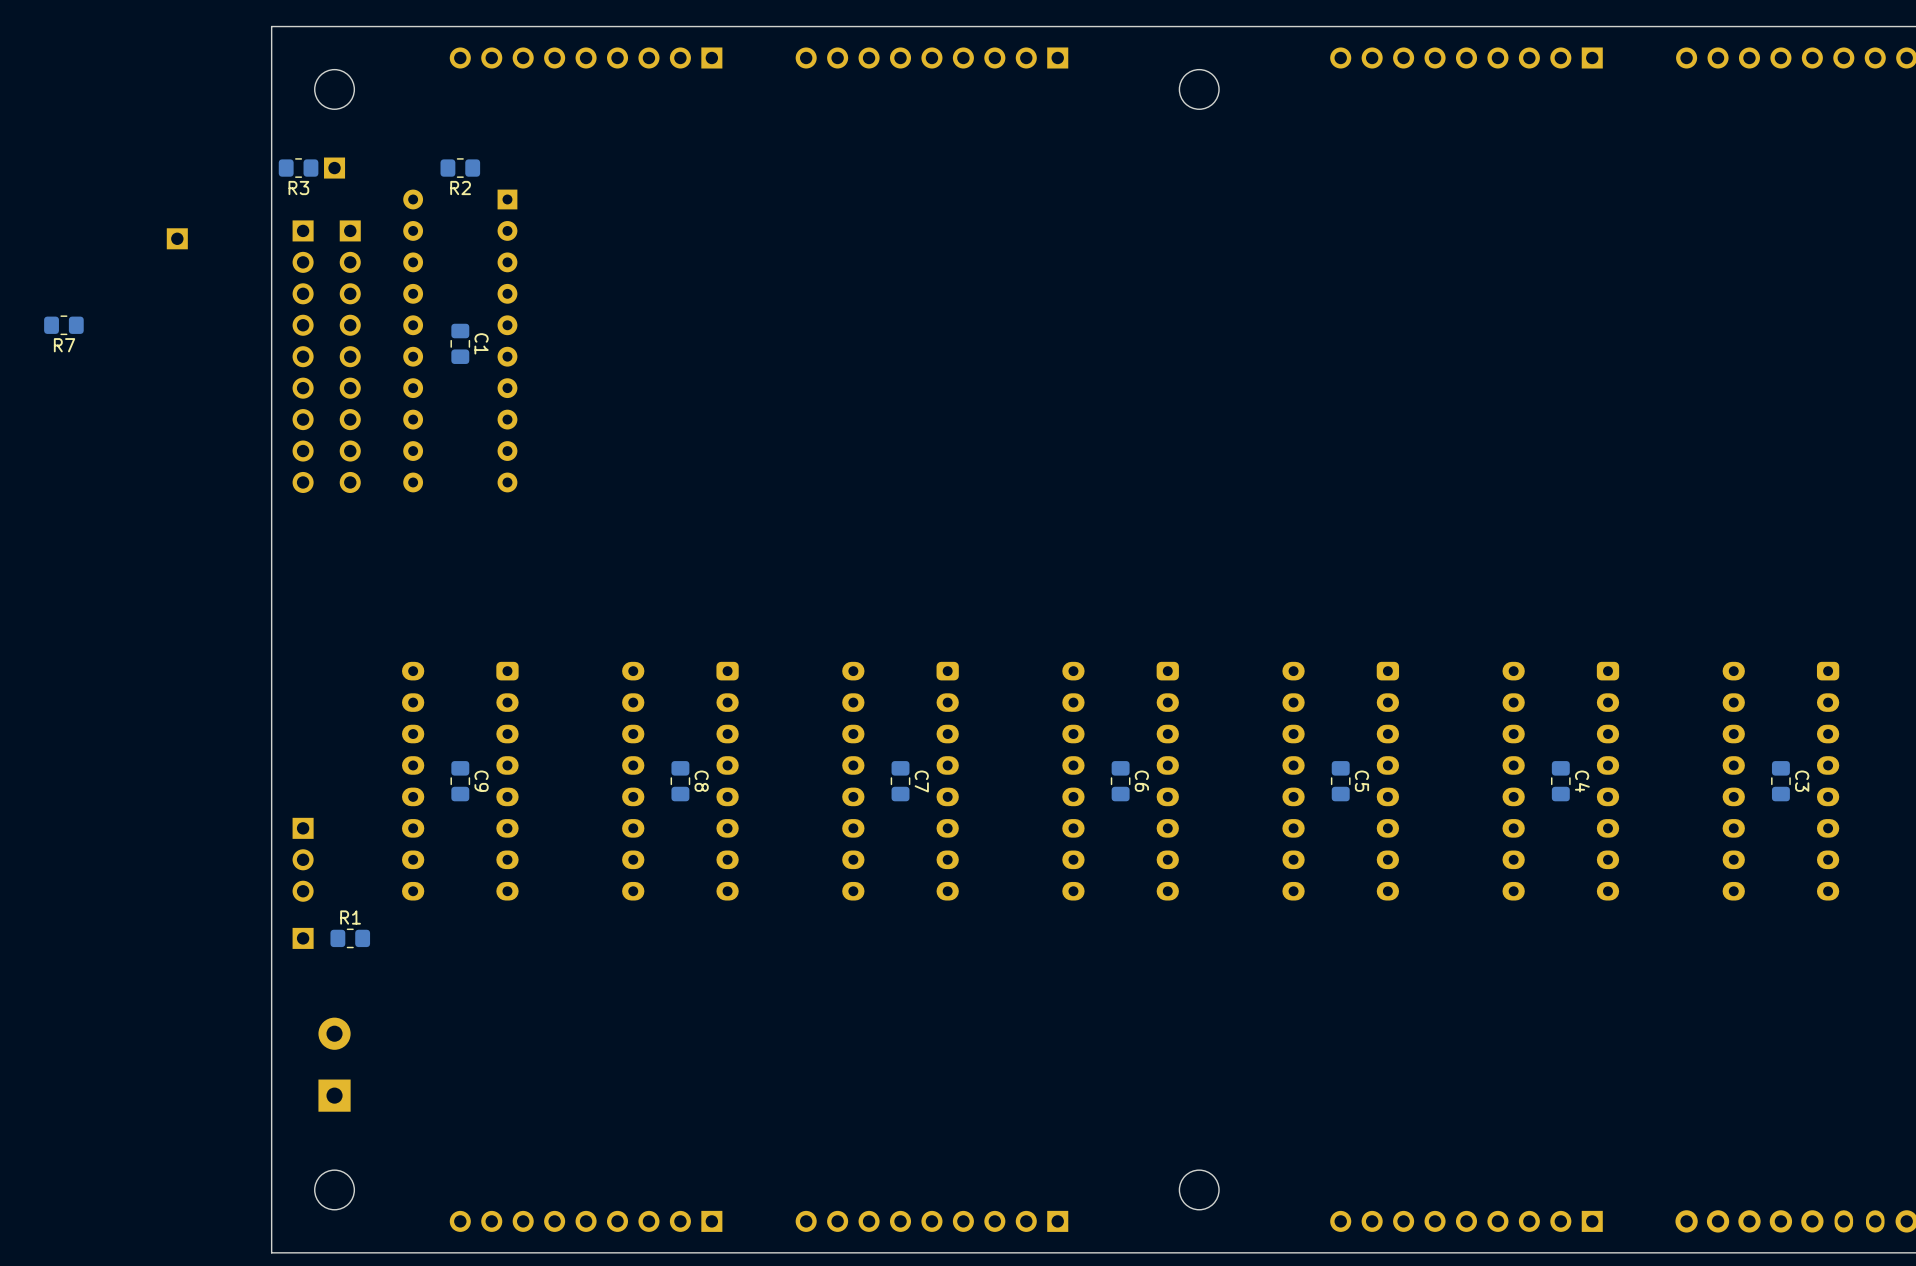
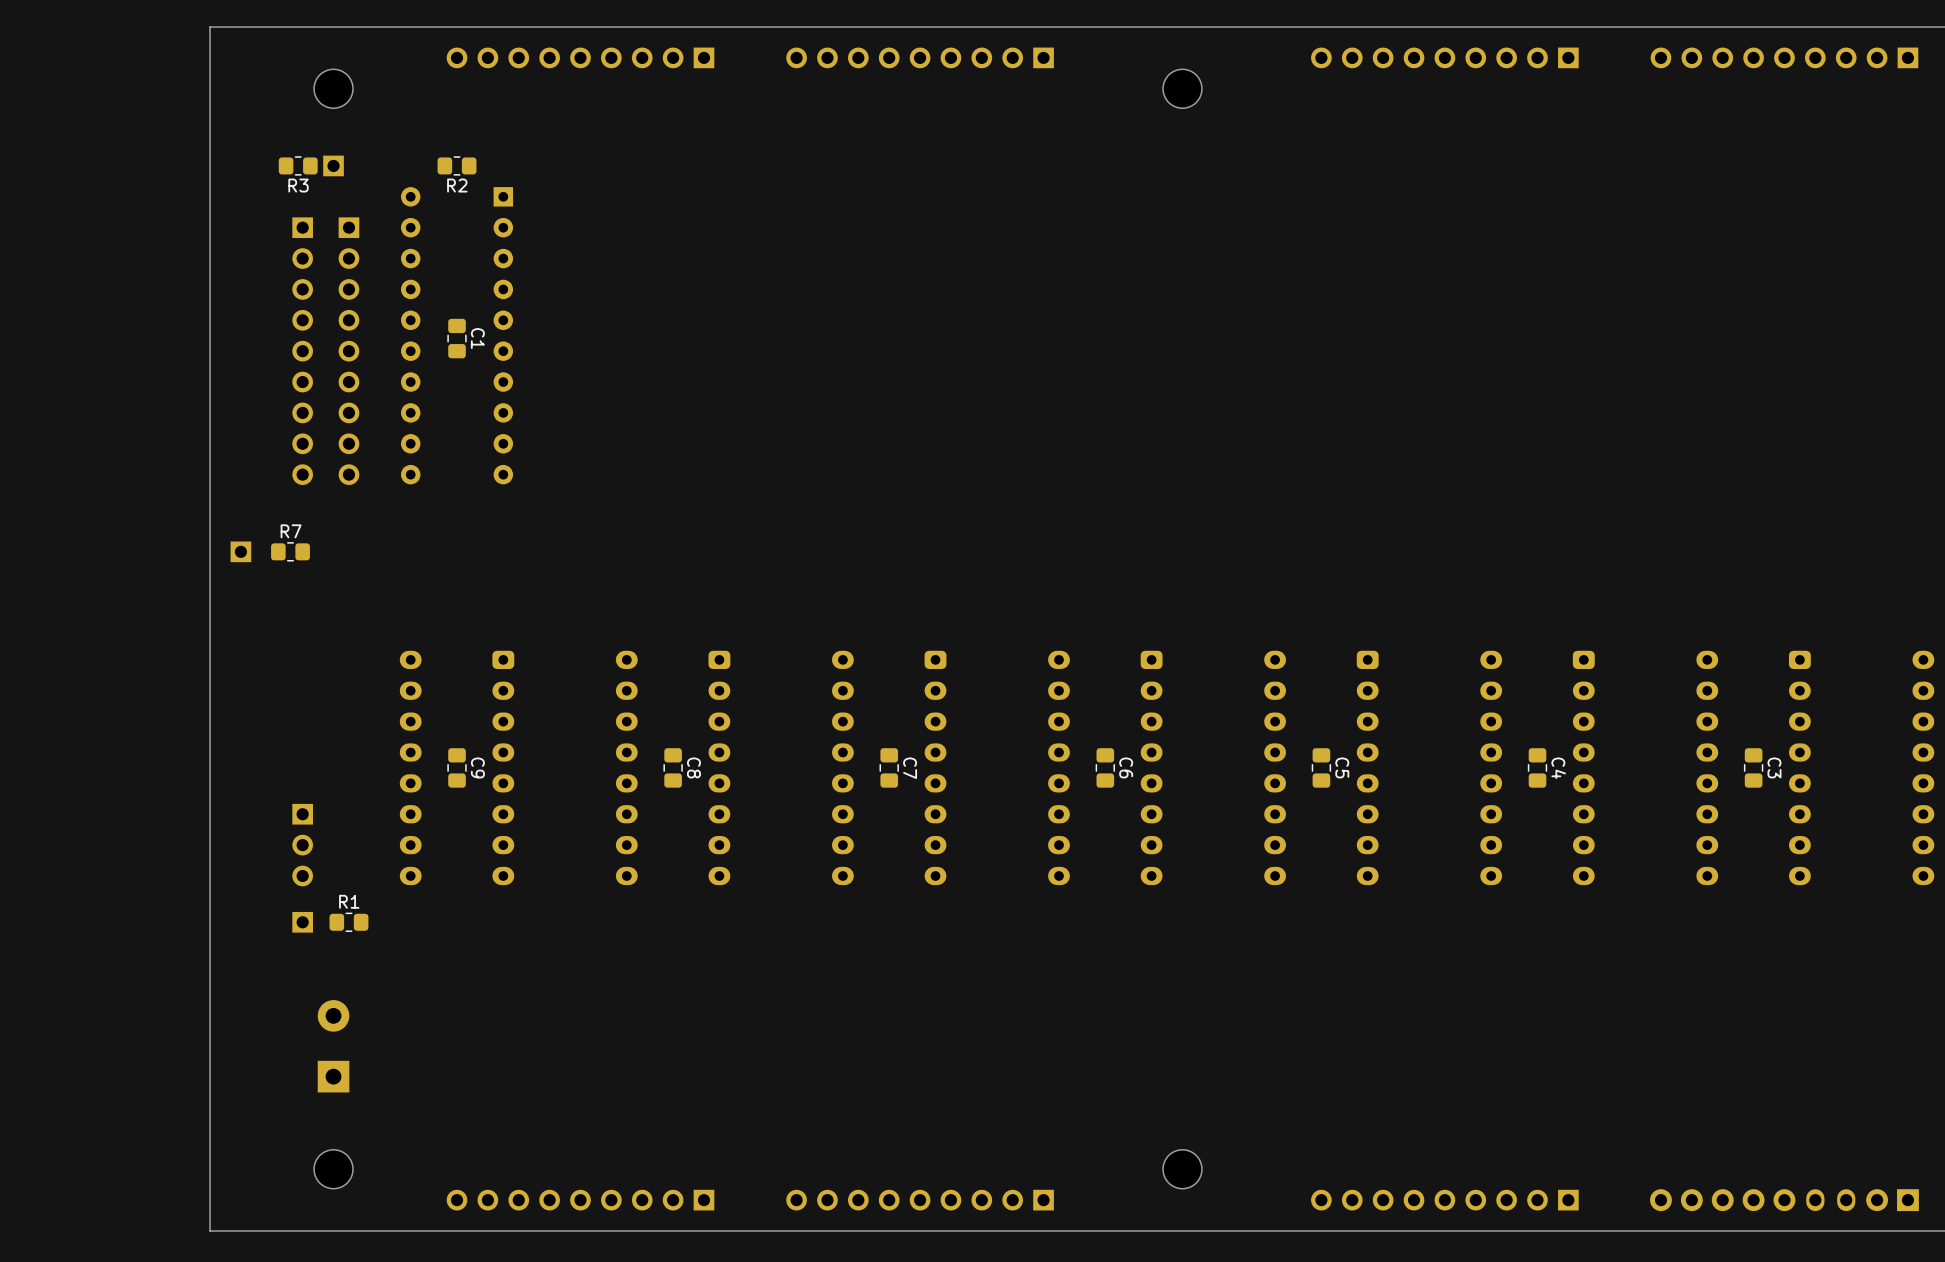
board edge: (271, 26) (271, 1252) -> (271, 27) (210, 27) (210, 1230) (271, 1230)
part: (177, 238) -> none
R7 position: (63, 325) -> (290, 551)
R7 name position: R7 (64, 345) -> R7 (291, 531)
part: none -> (240, 551)

